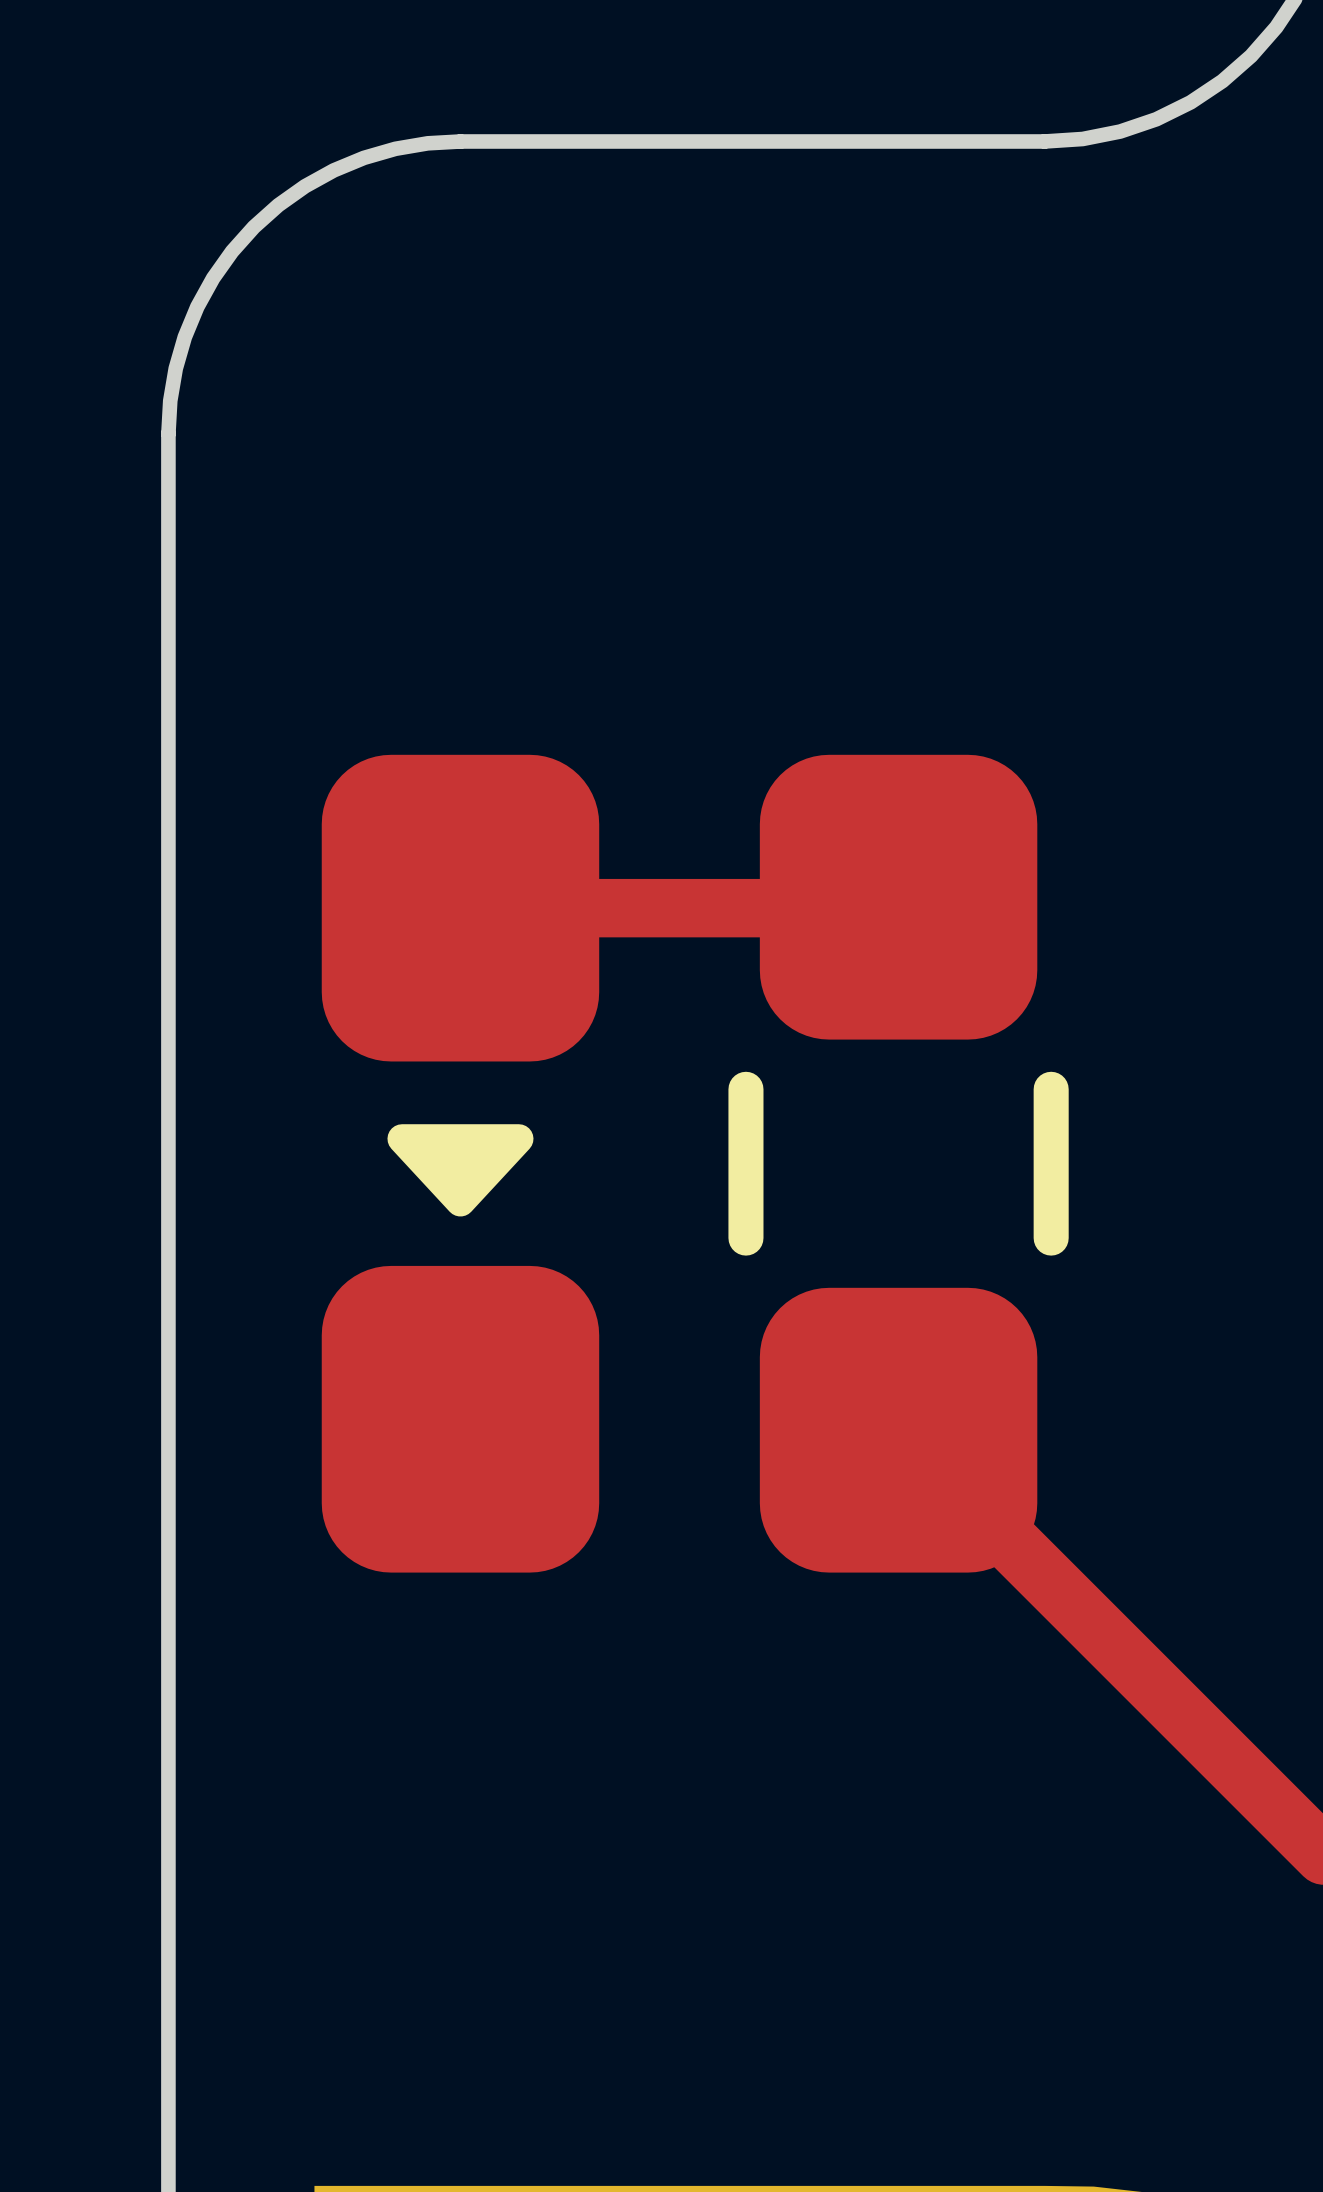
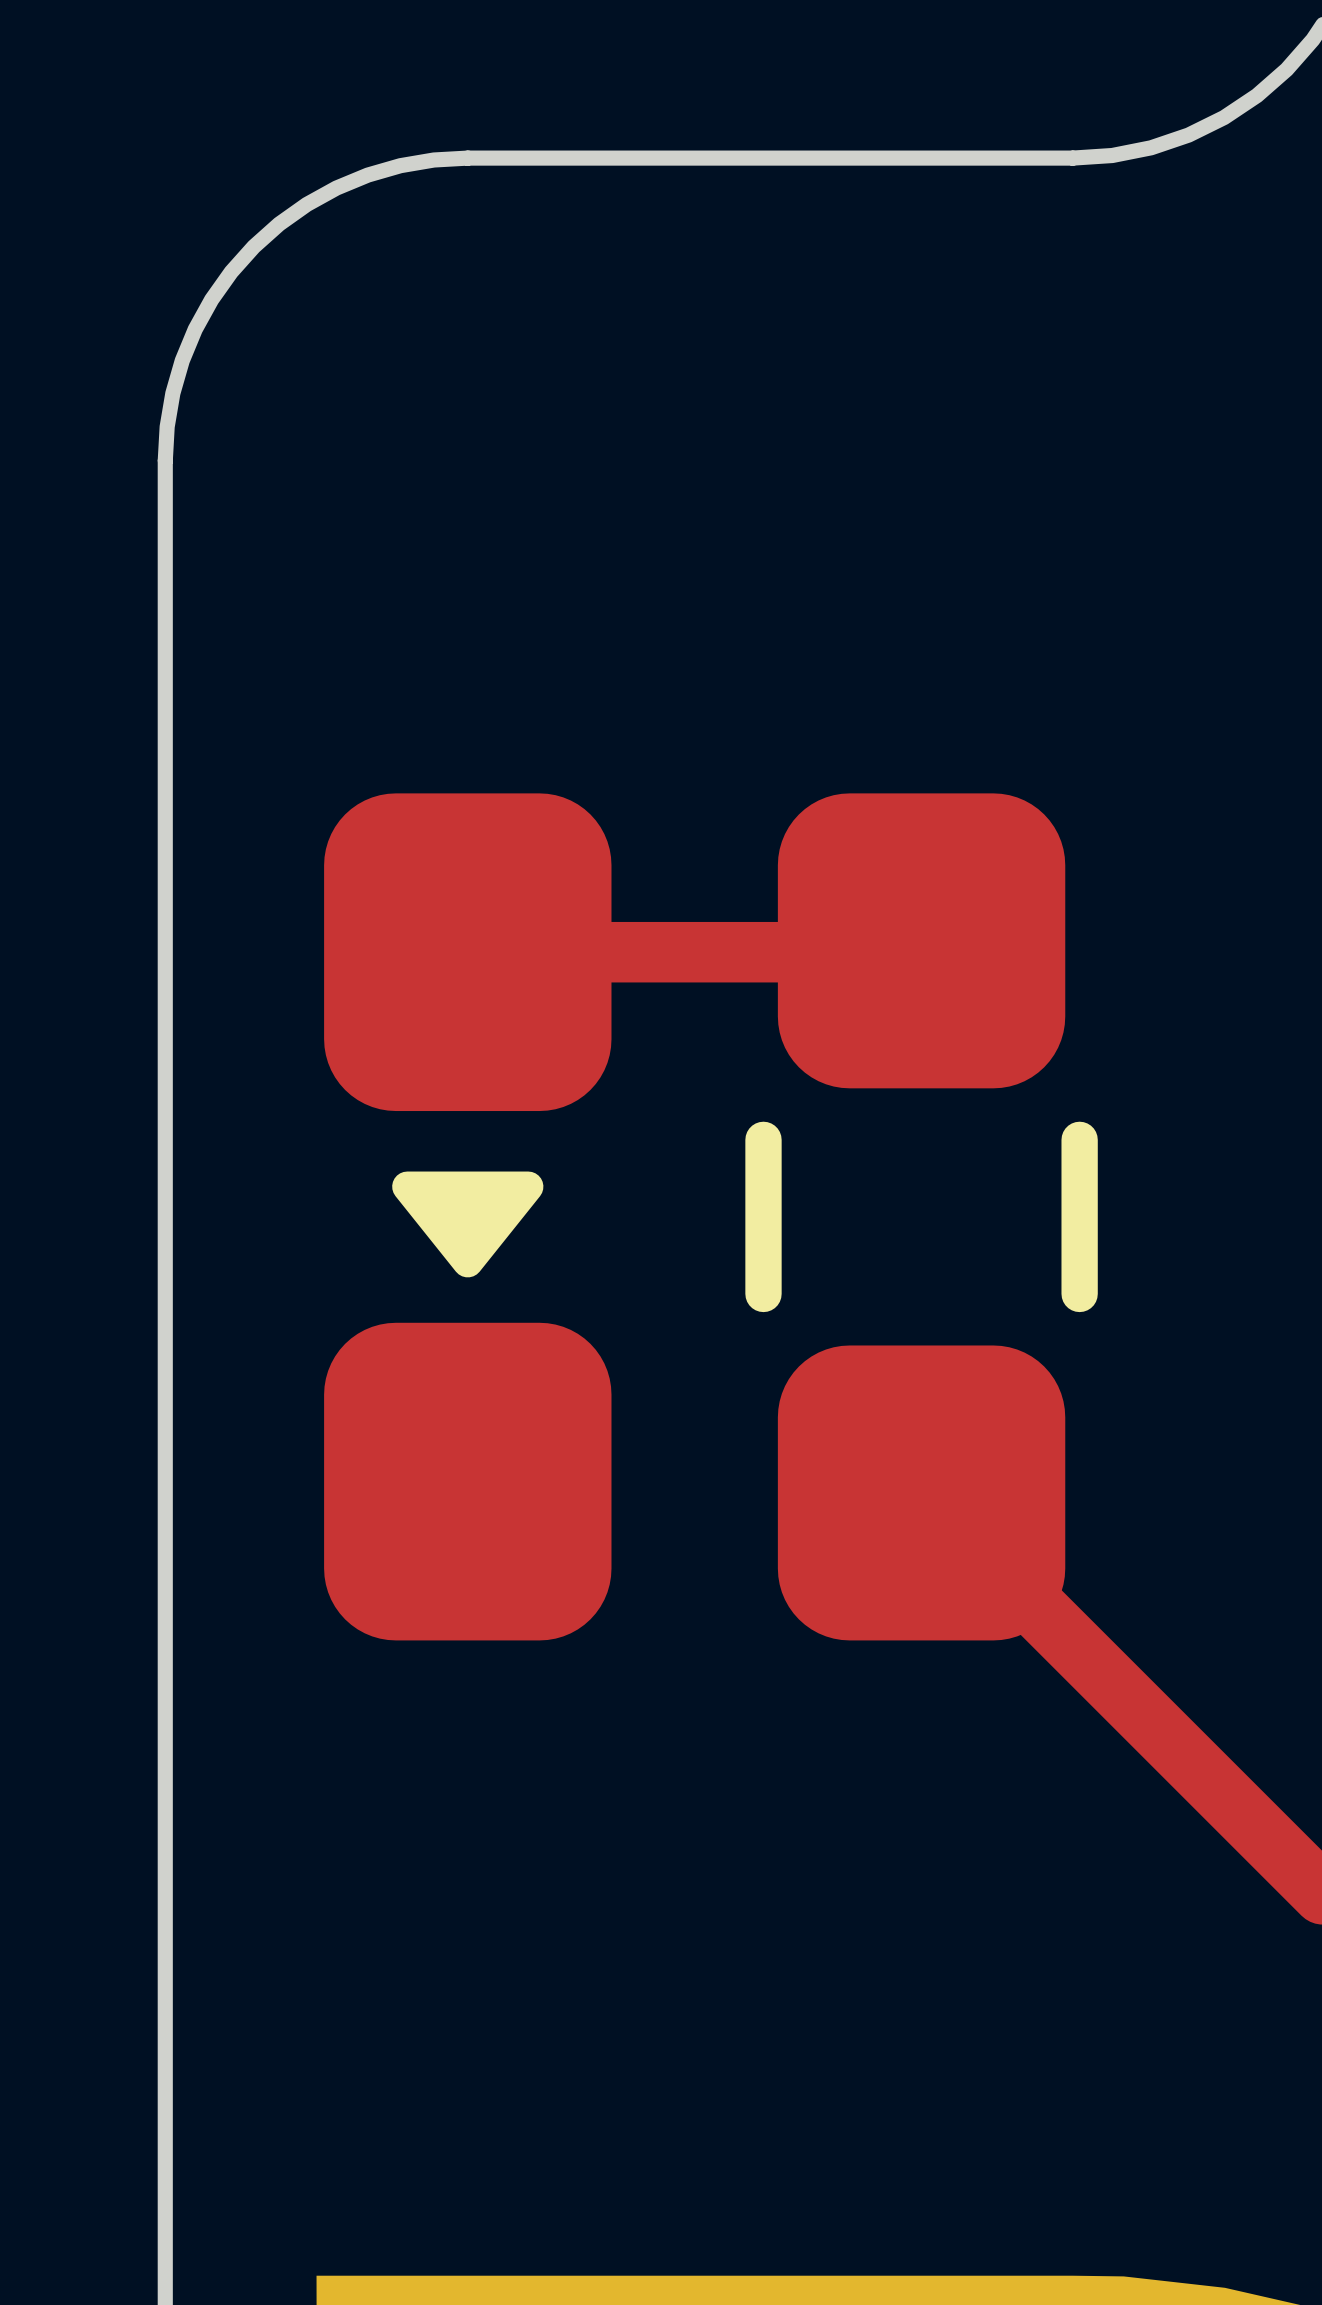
part footprint: [321, 754, 600, 1573] -> [324, 793, 612, 1641]

